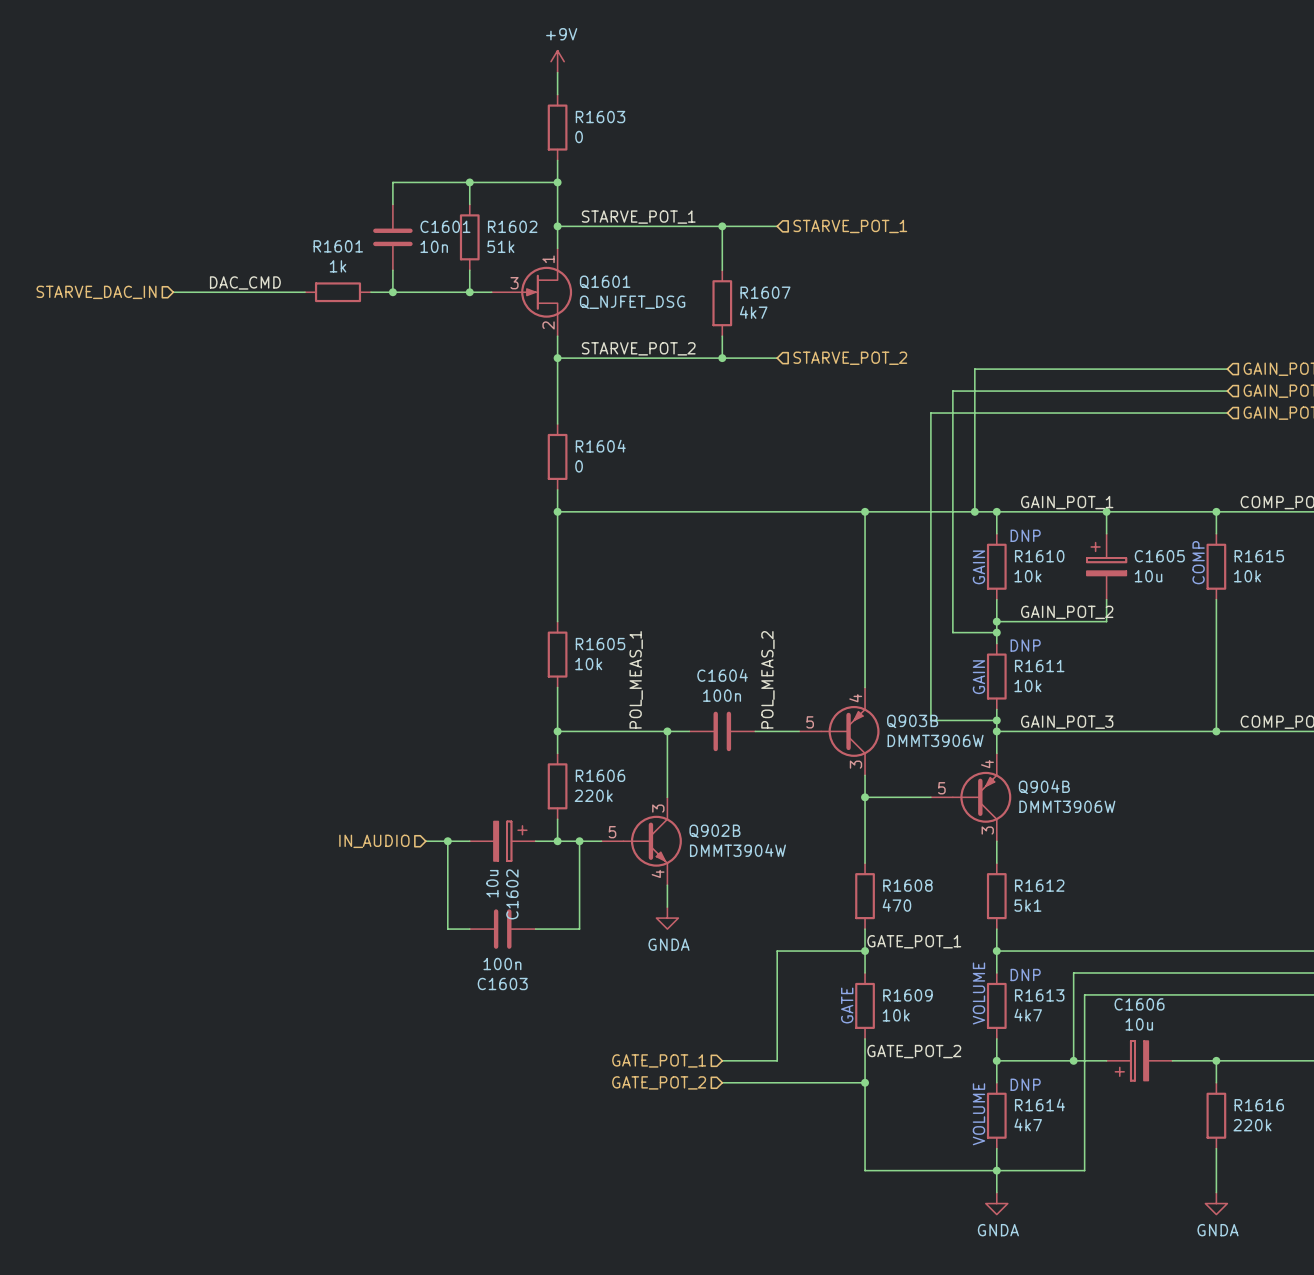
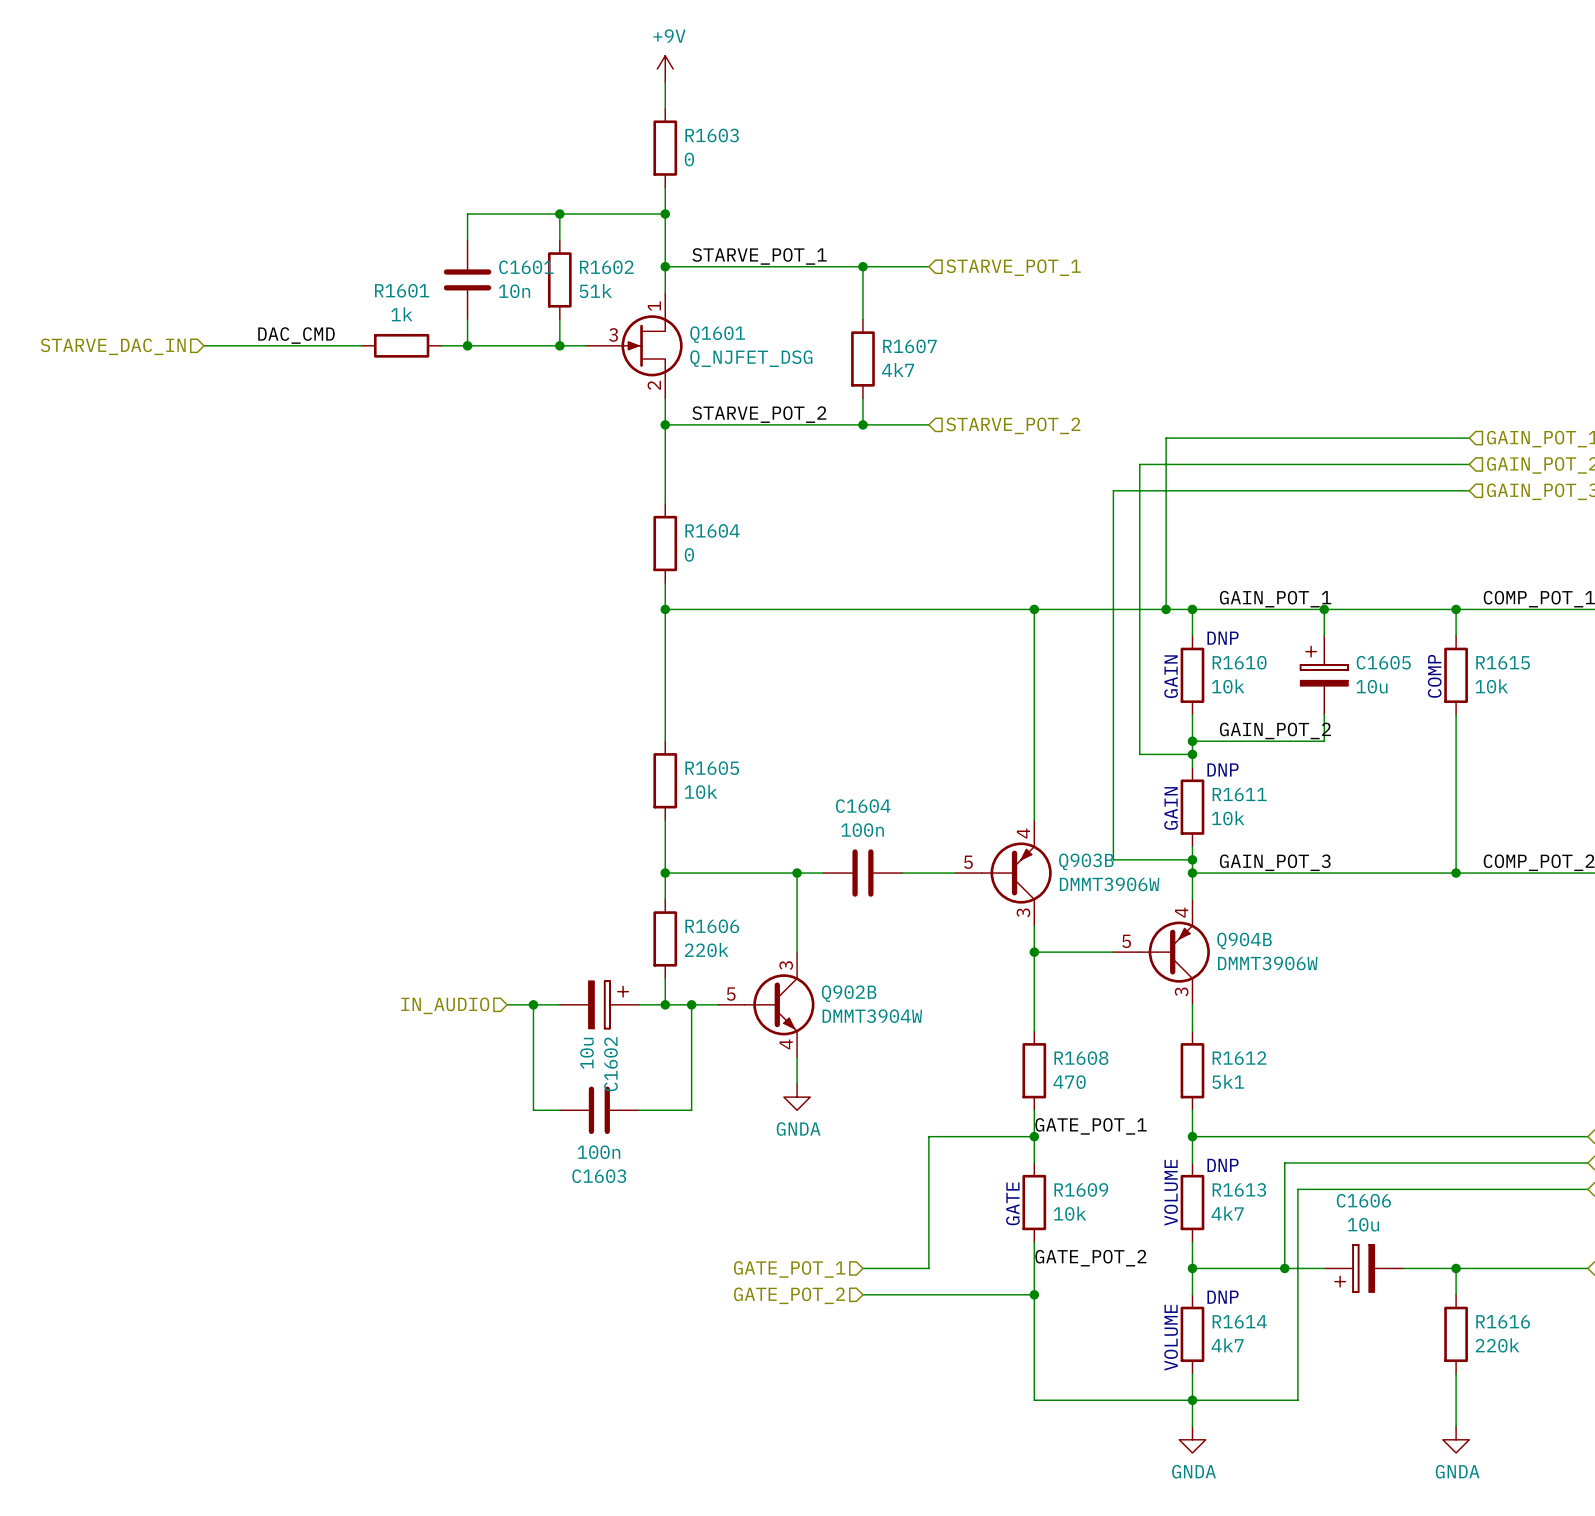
label: POL_MEAS_1 (636, 679) -> none
label: POL_MEAS_2 (767, 679) -> none

